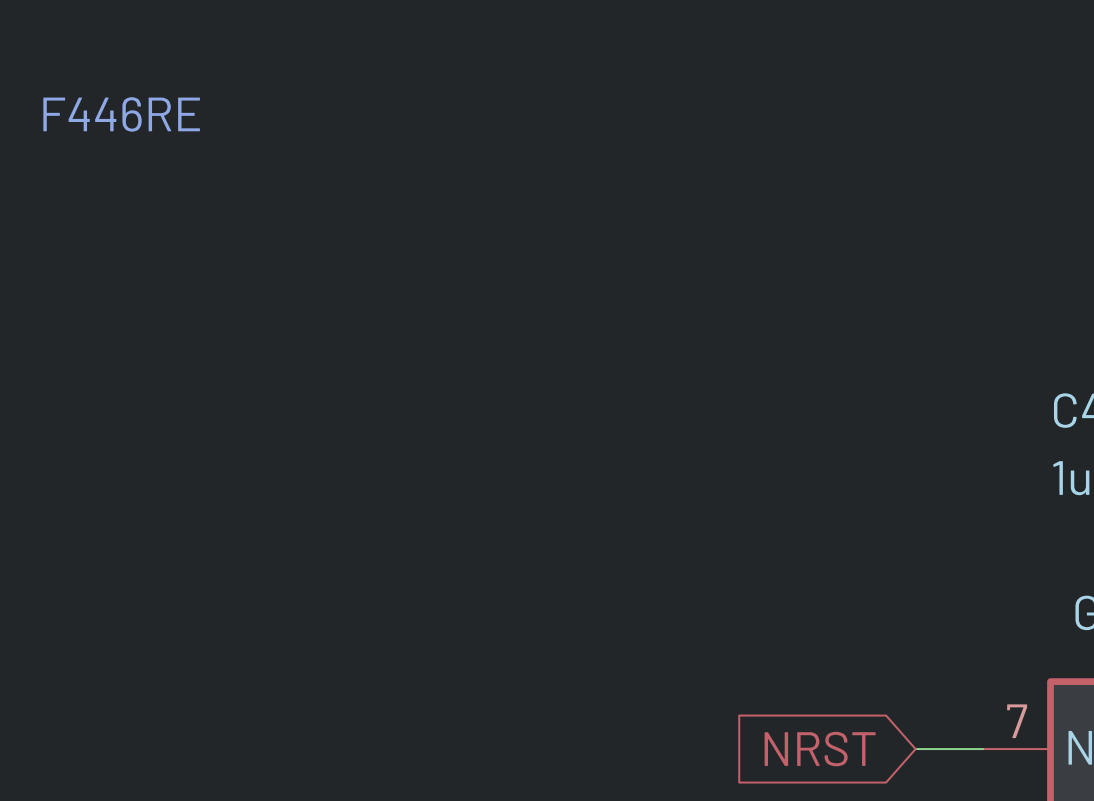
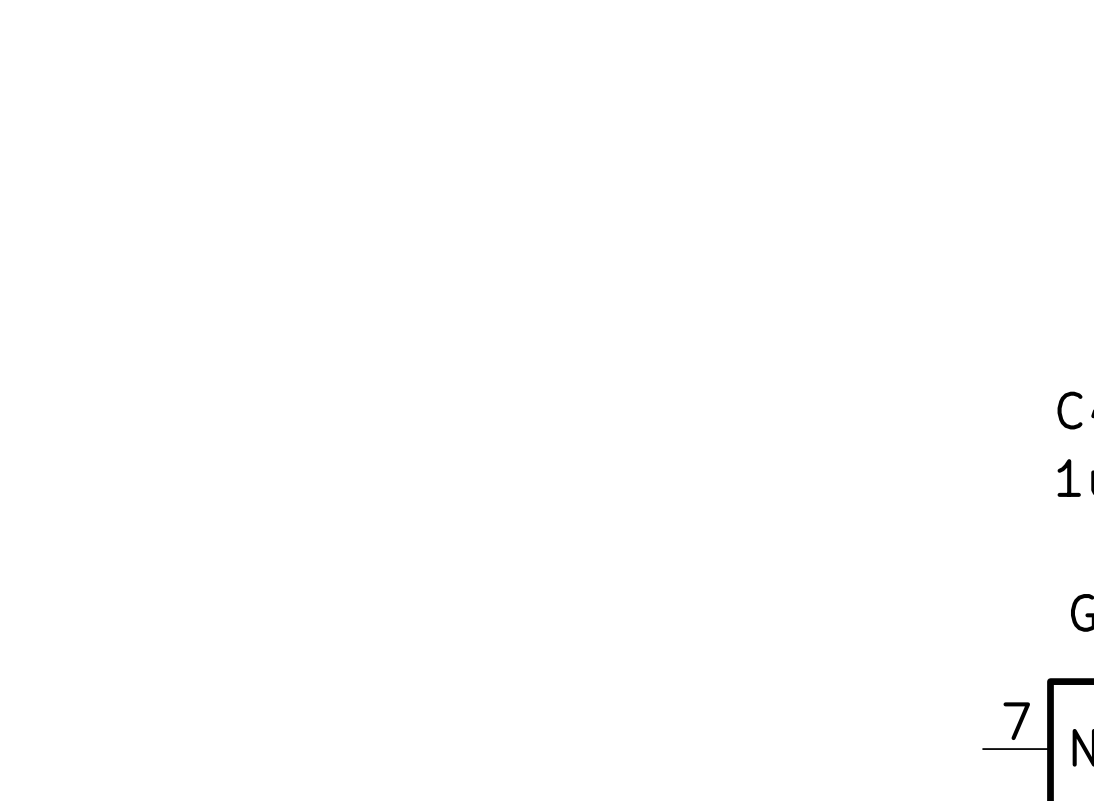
text: F446RE (121, 114) -> none
global label: NRST (820, 749) -> none
wire: (915, 749) (983, 749) -> none

